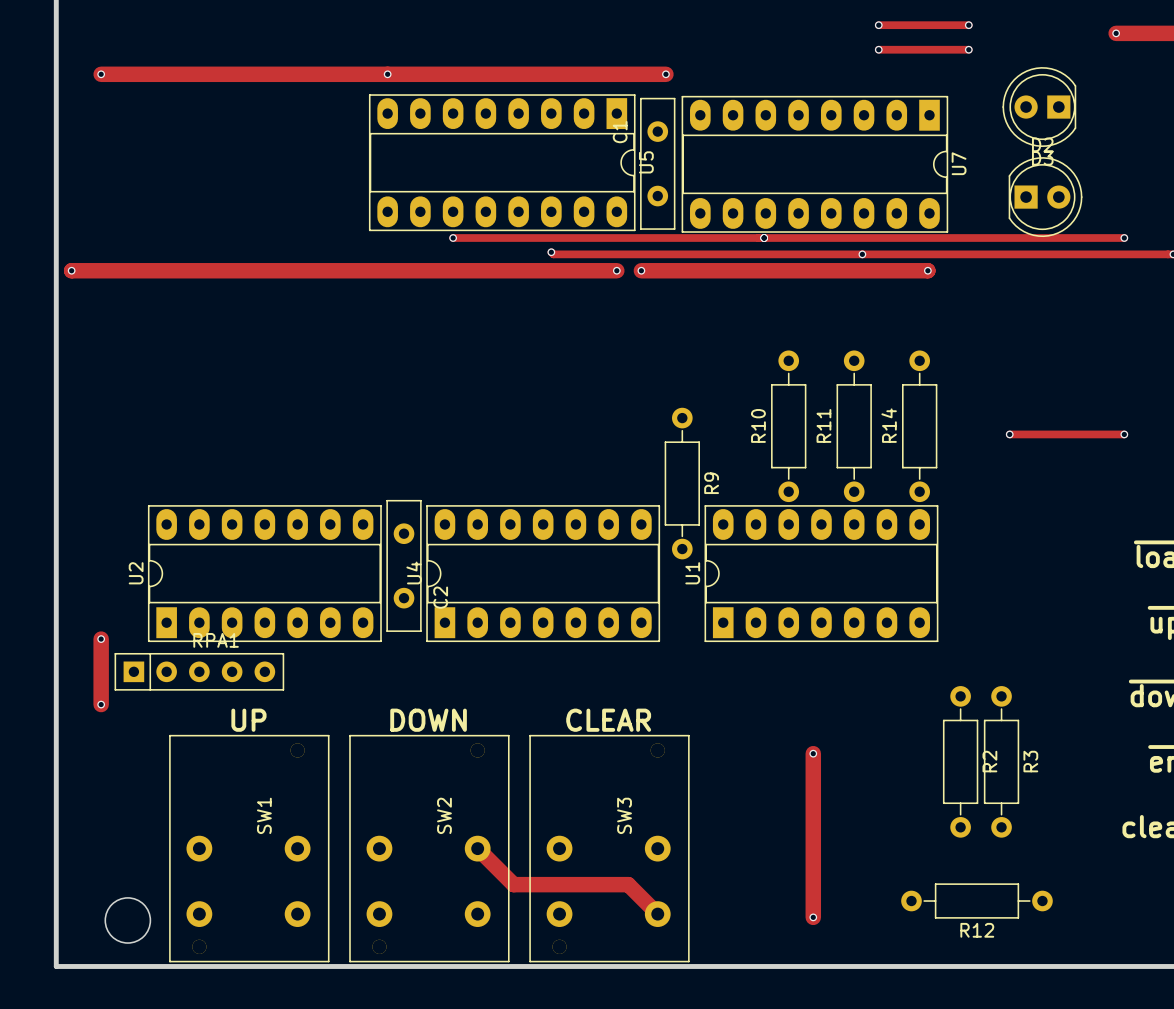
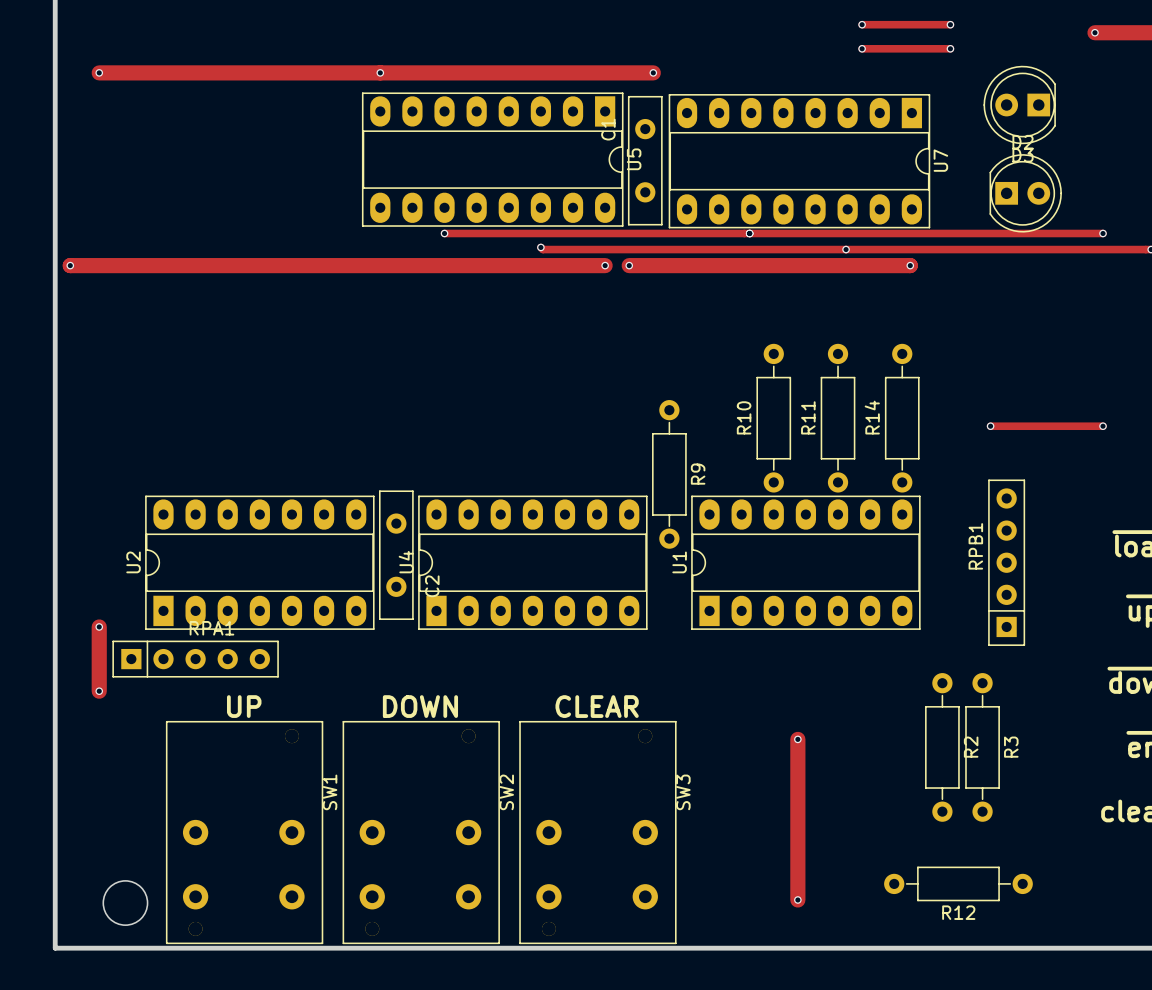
RPB1: none -> (1006, 562)
SW1 name position: SW1 (264, 815) -> SW1 (330, 792)
SW2 name position: SW2 (444, 815) -> SW2 (506, 792)
SW3 name position: SW3 (624, 815) -> SW3 (683, 792)
track: (477, 848) (513, 884) (628, 884) (657, 914) -> none

